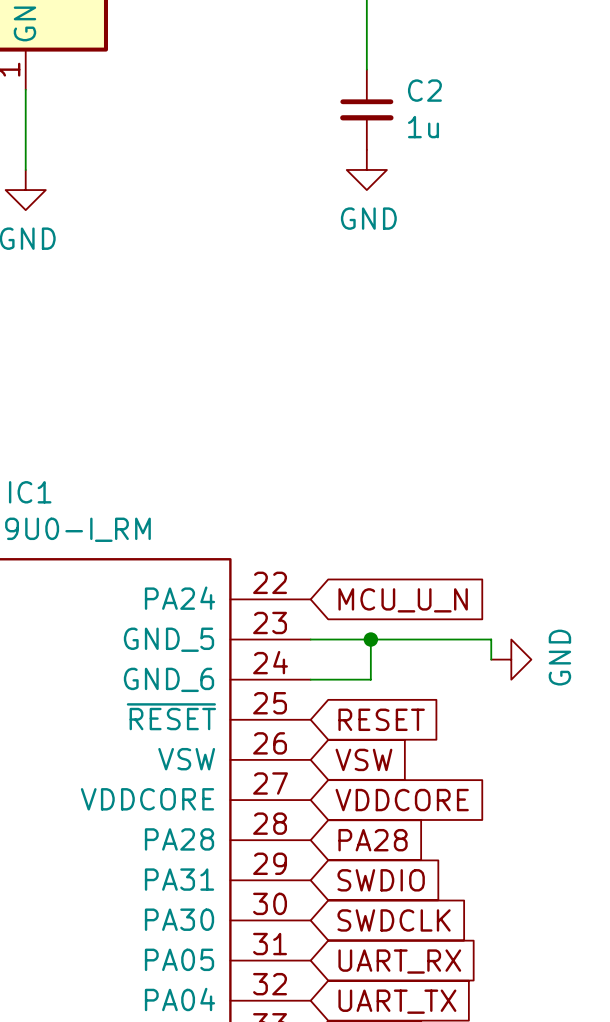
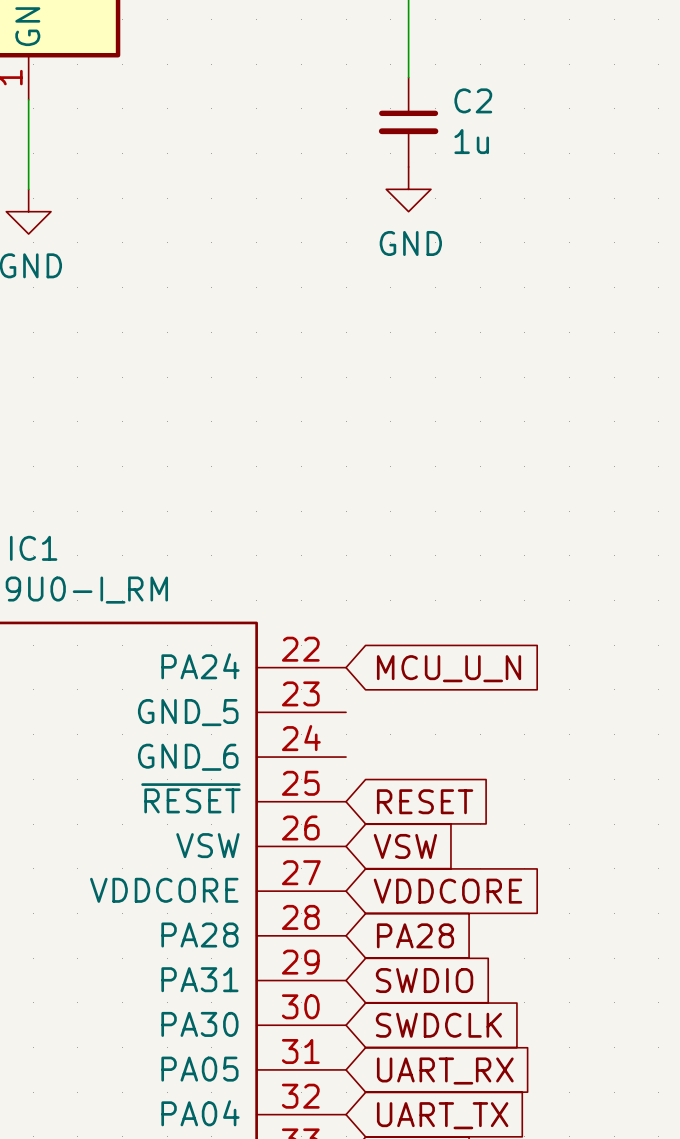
wire: (310, 639) (491, 639) (491, 659) -> none
wire: (370, 639) (370, 679) (310, 679) -> none
junction: (370, 639) -> none
power symbol: GND (511, 659) -> none

